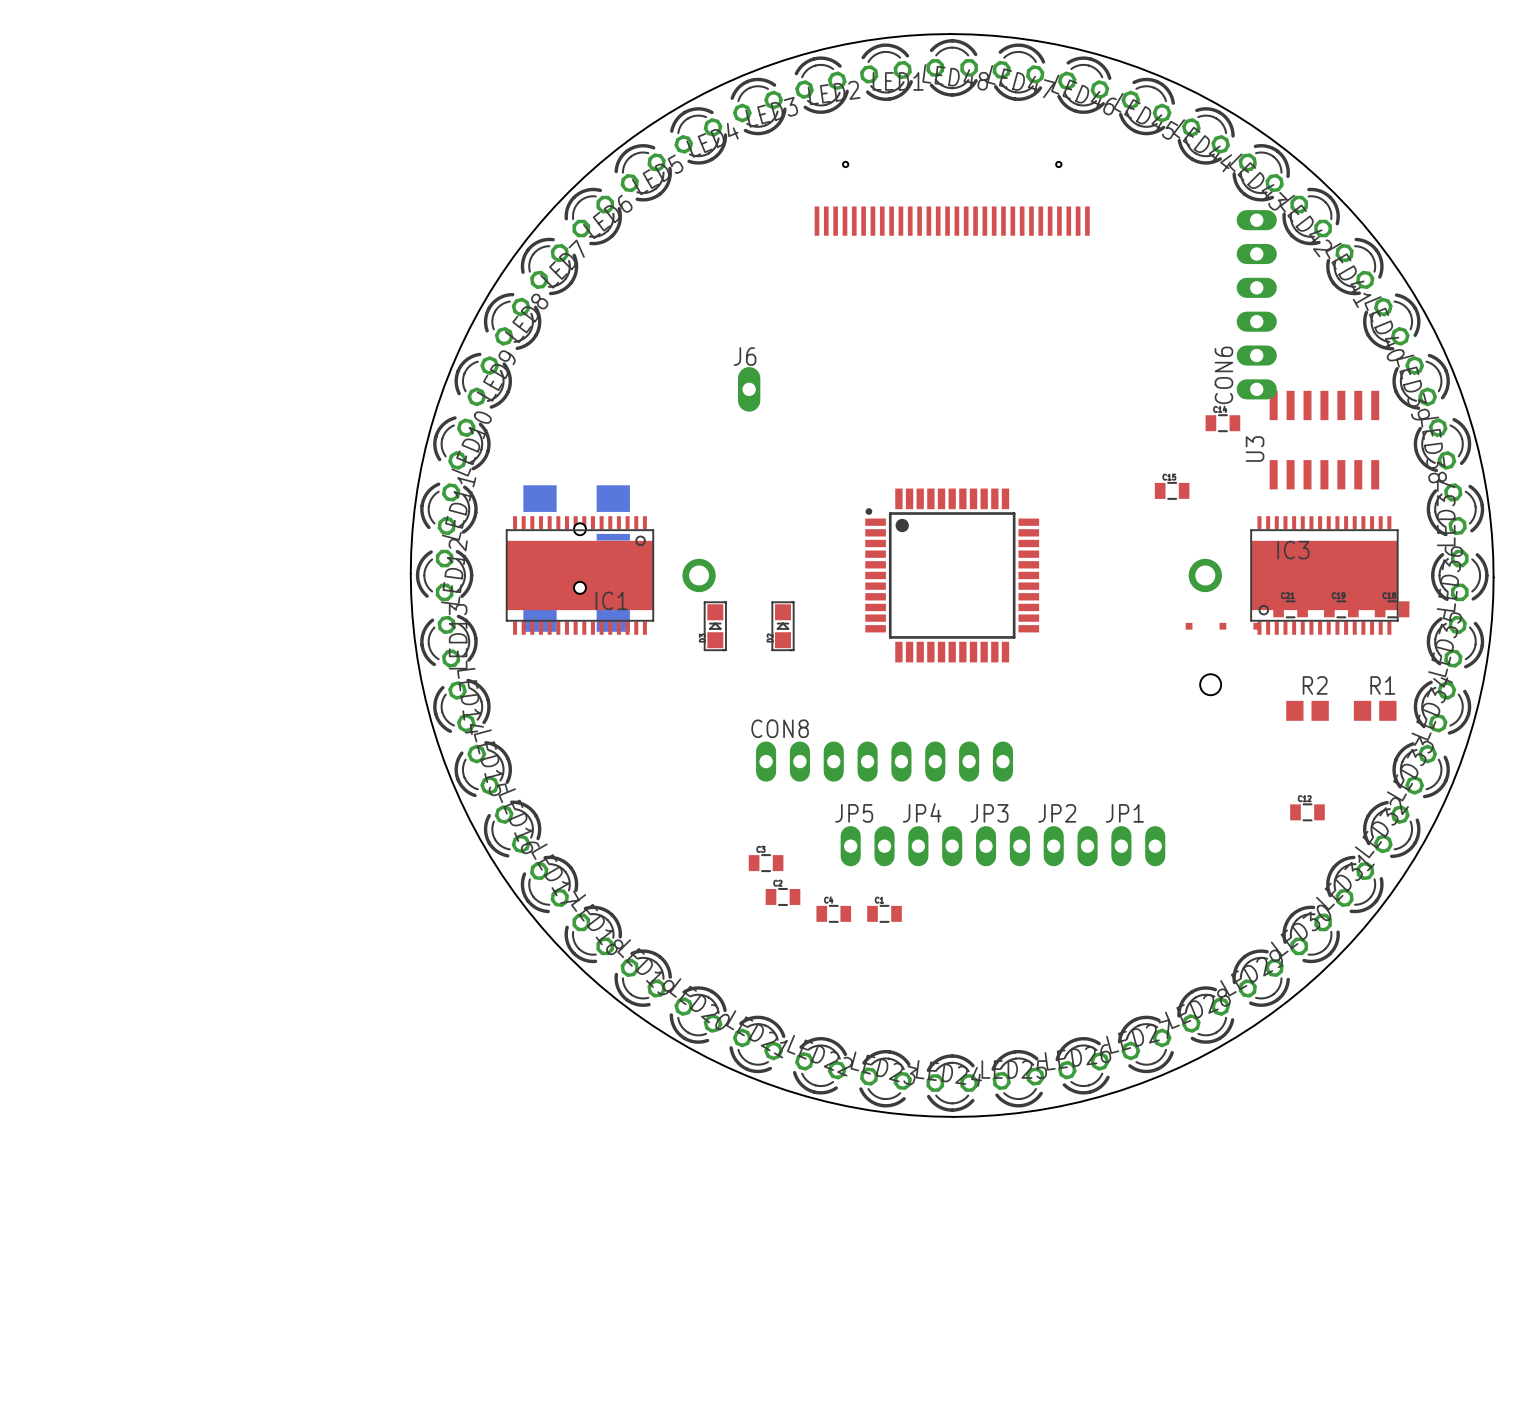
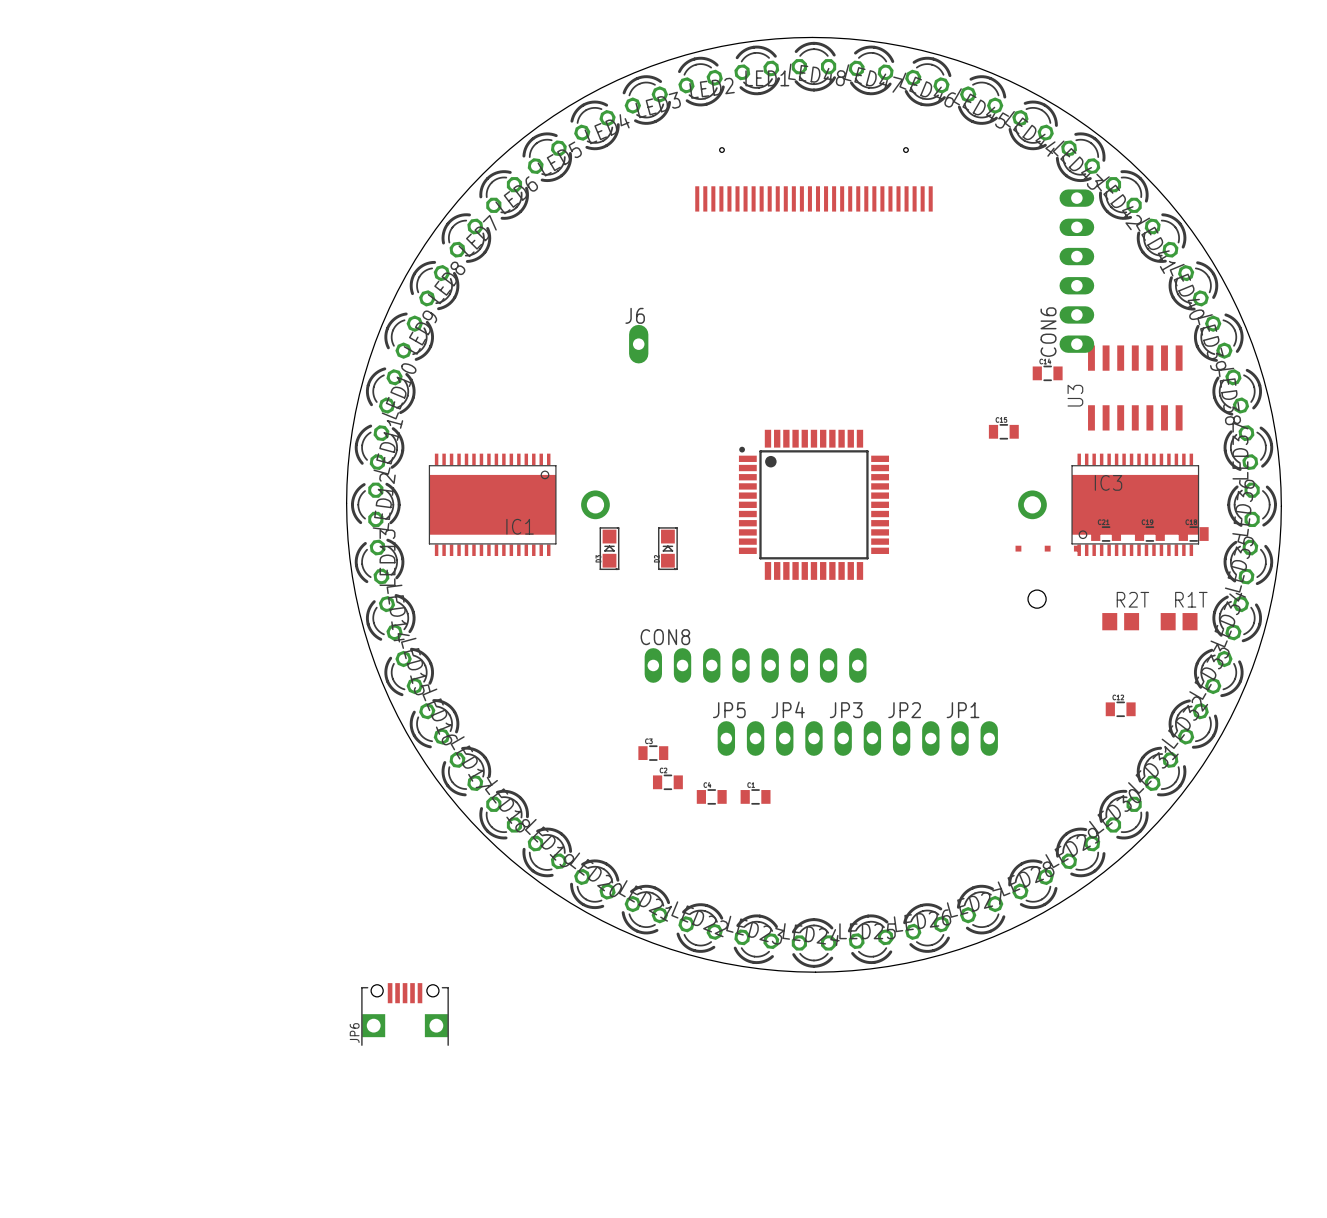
part: (576, 558) -> none
R2 name: R2 (1315, 685) -> R2T (1132, 599)
R1 name: R1 (1382, 685) -> R1T (1191, 599)
JP6: none -> (405, 1014)

